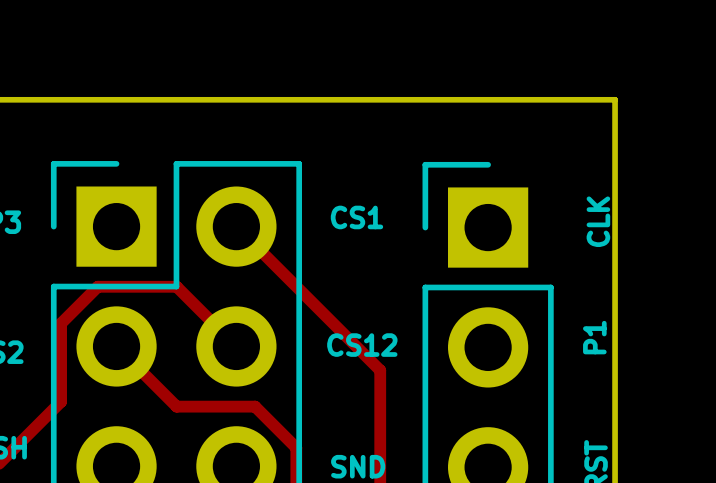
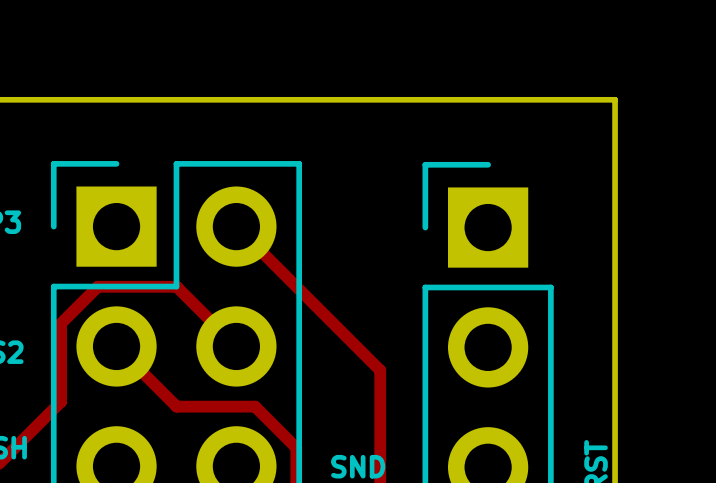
text: CS1 (356, 217) -> none
text: CLK (598, 221) -> none
text: P1 (594, 337) -> none
text: CS12 (362, 345) -> none

